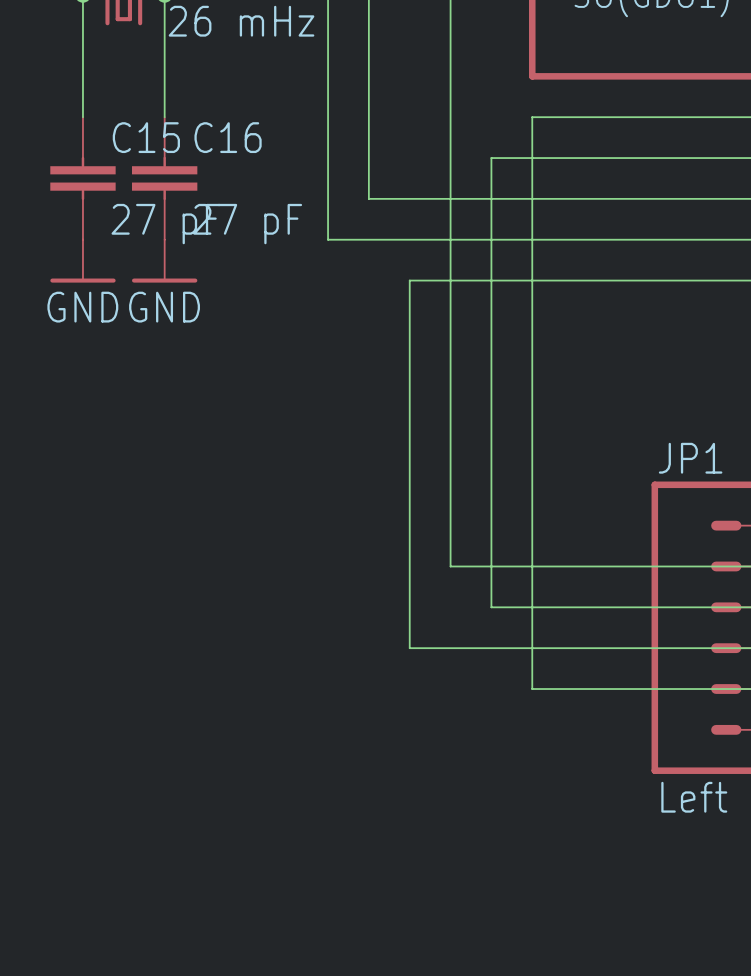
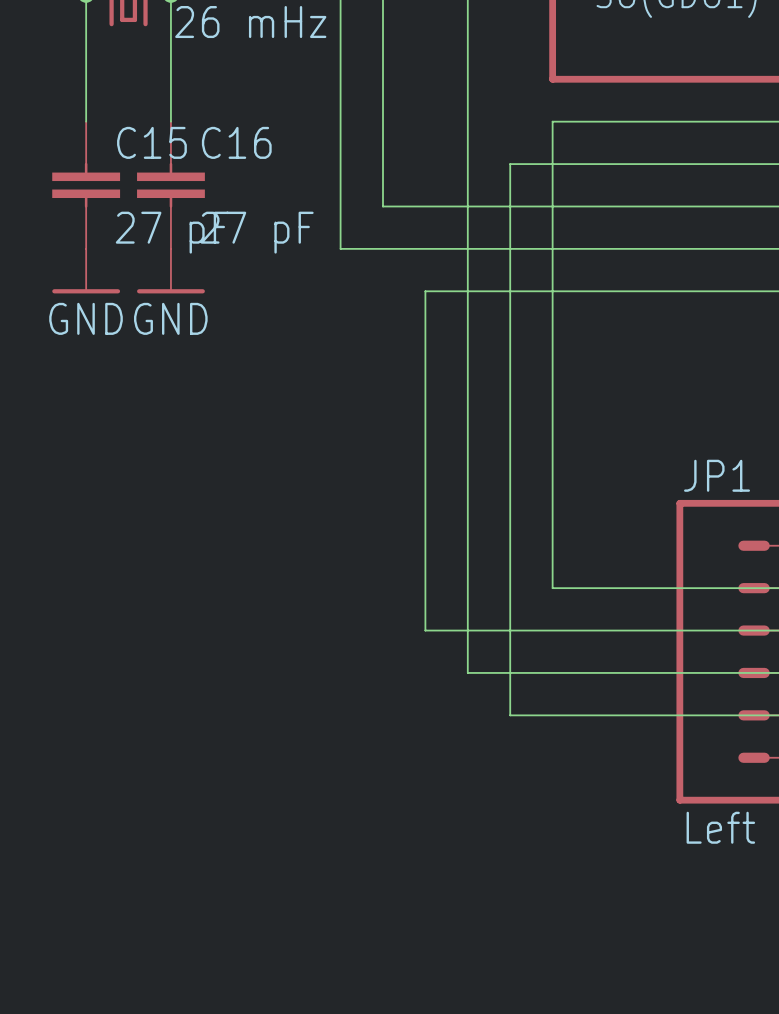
wire: (450, 566) (532, 566) (532, 689) -> (425, 630) (510, 630) (510, 715) (552, 715)
wire: (409, 607) (409, 648) (450, 648) -> (467, 588) (467, 672)

